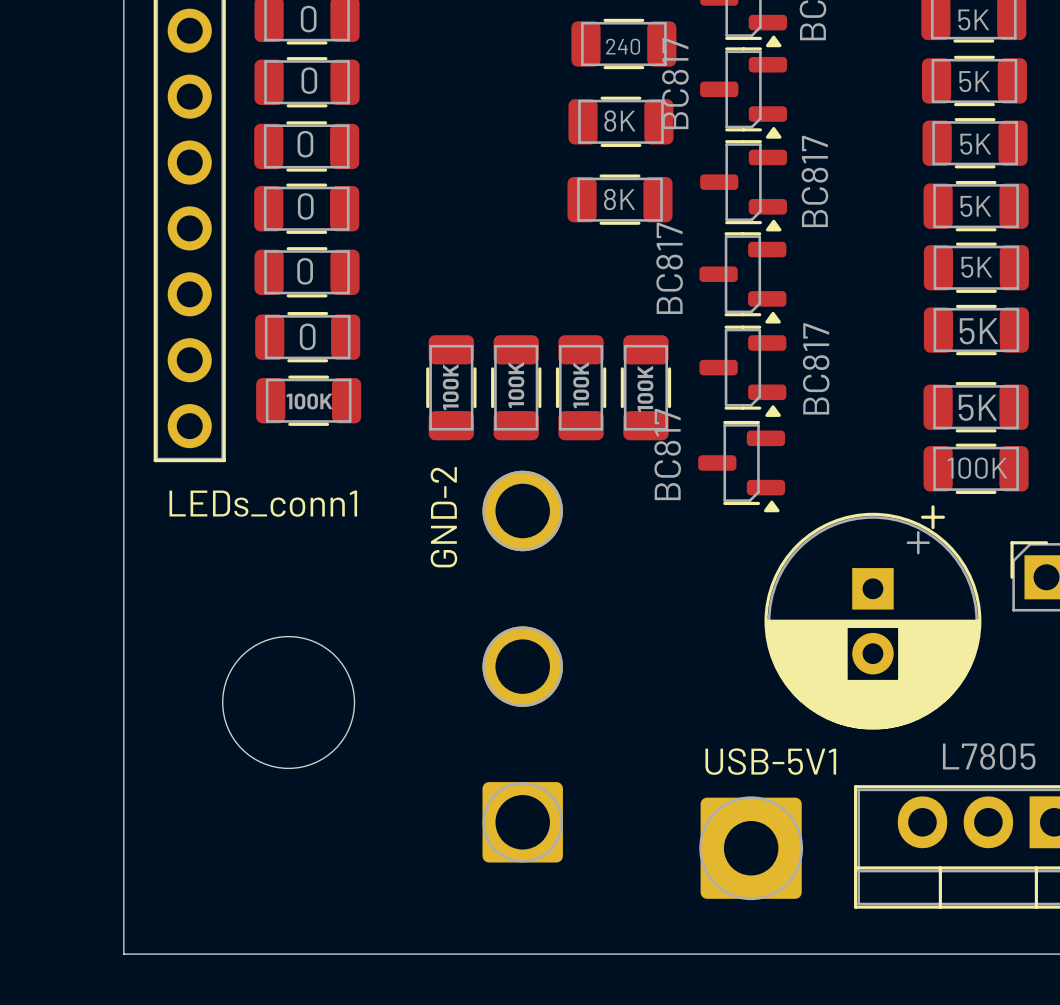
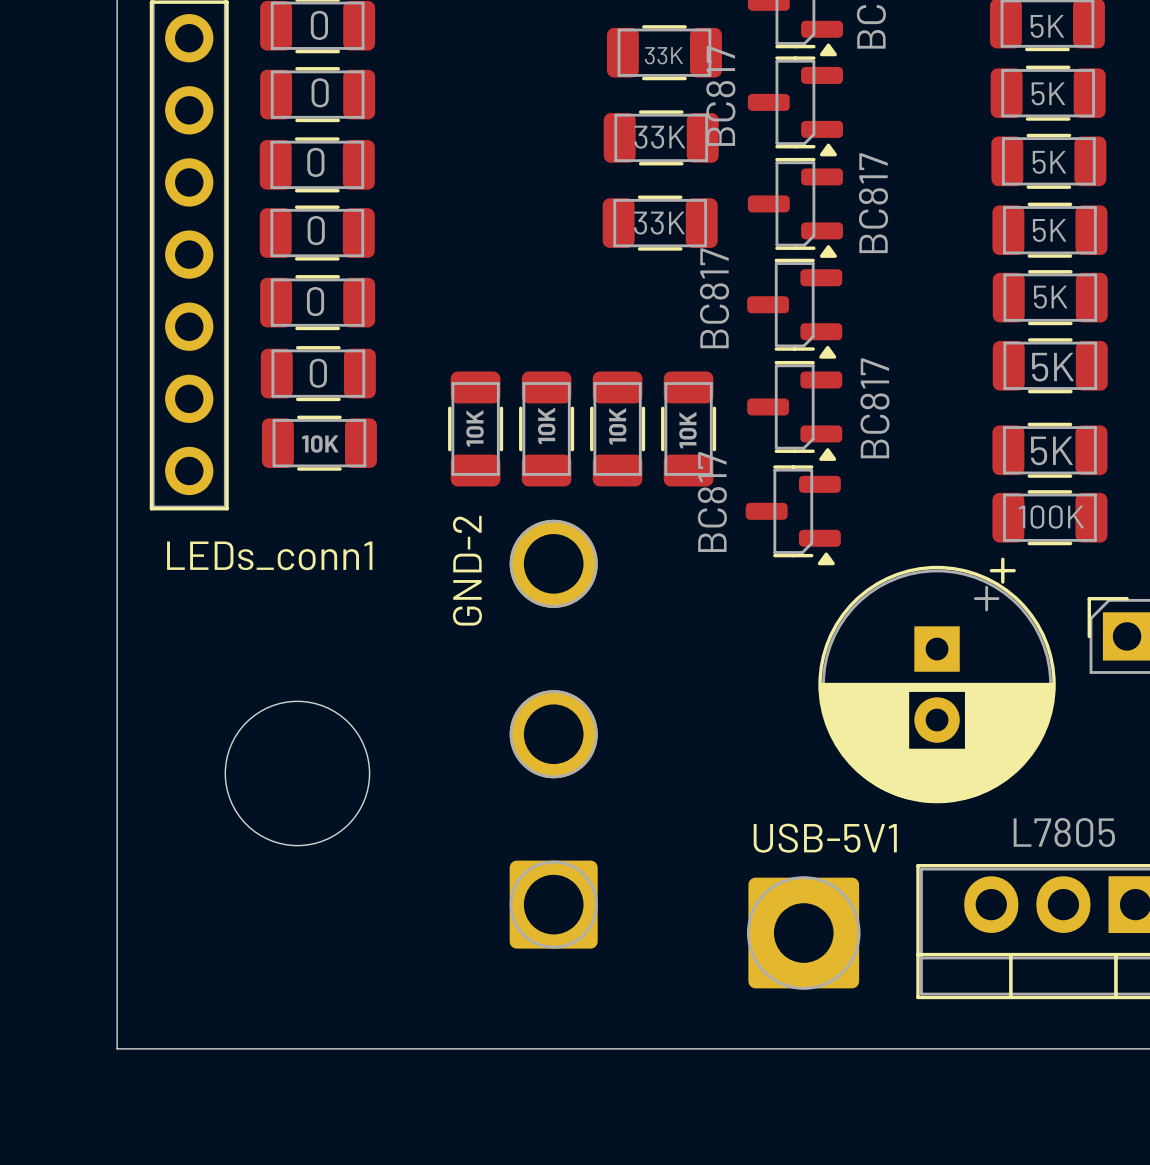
part value: 240 (623, 46) -> 33K (664, 55)
part value: 8K (619, 121) -> 33K (659, 137)
part value: 8K (619, 199) -> 33K (659, 223)
part value: 100K (516, 384) -> 10K (546, 425)
part value: 100K (581, 385) -> 10K (617, 426)
part value: 100K (450, 387) -> 10K (475, 428)
part value: 100K (645, 388) -> 10K (687, 430)
part value: 100K (309, 401) -> 10K (320, 443)

